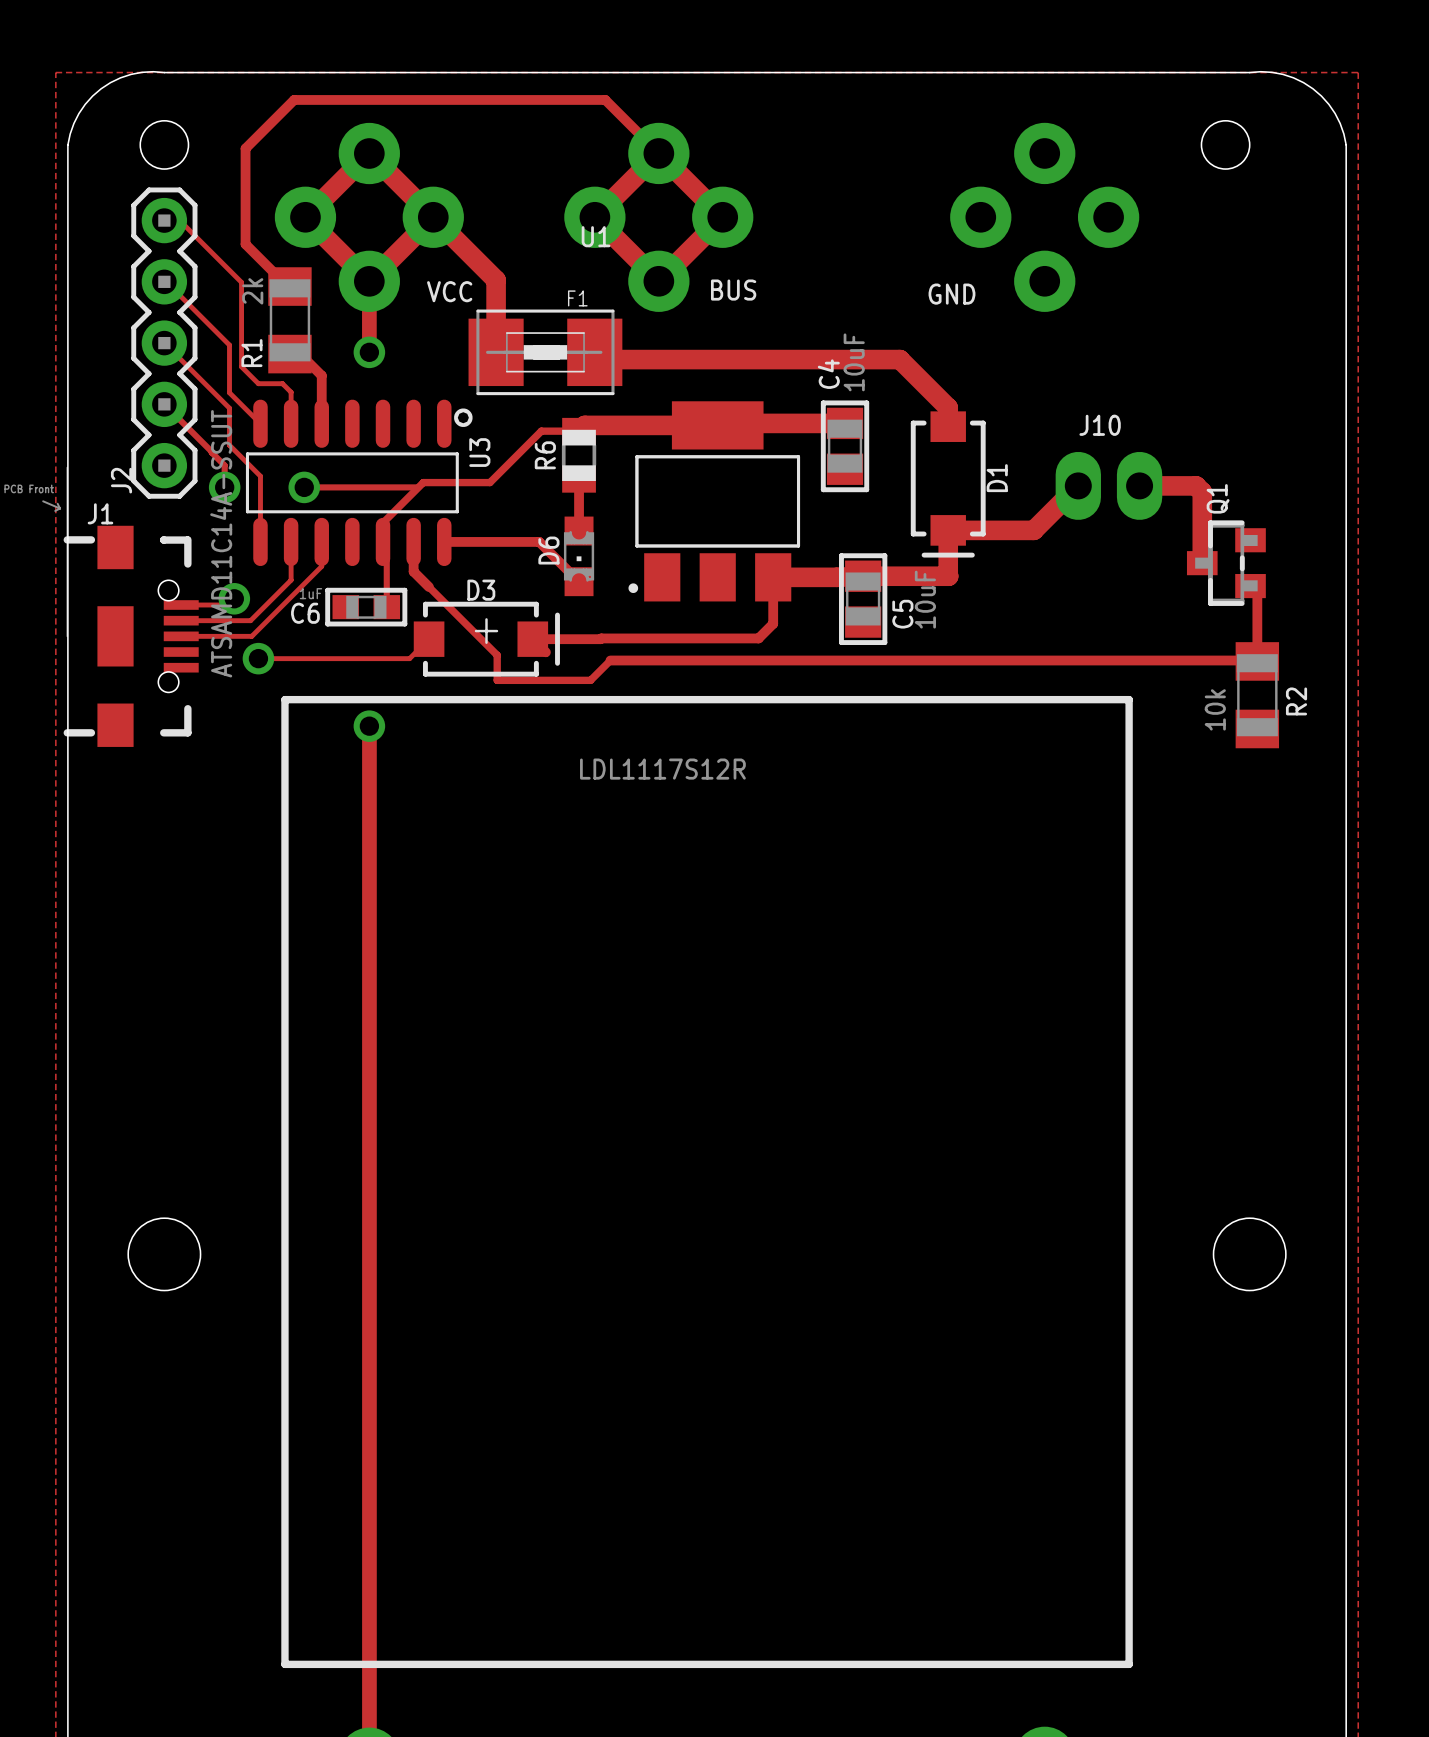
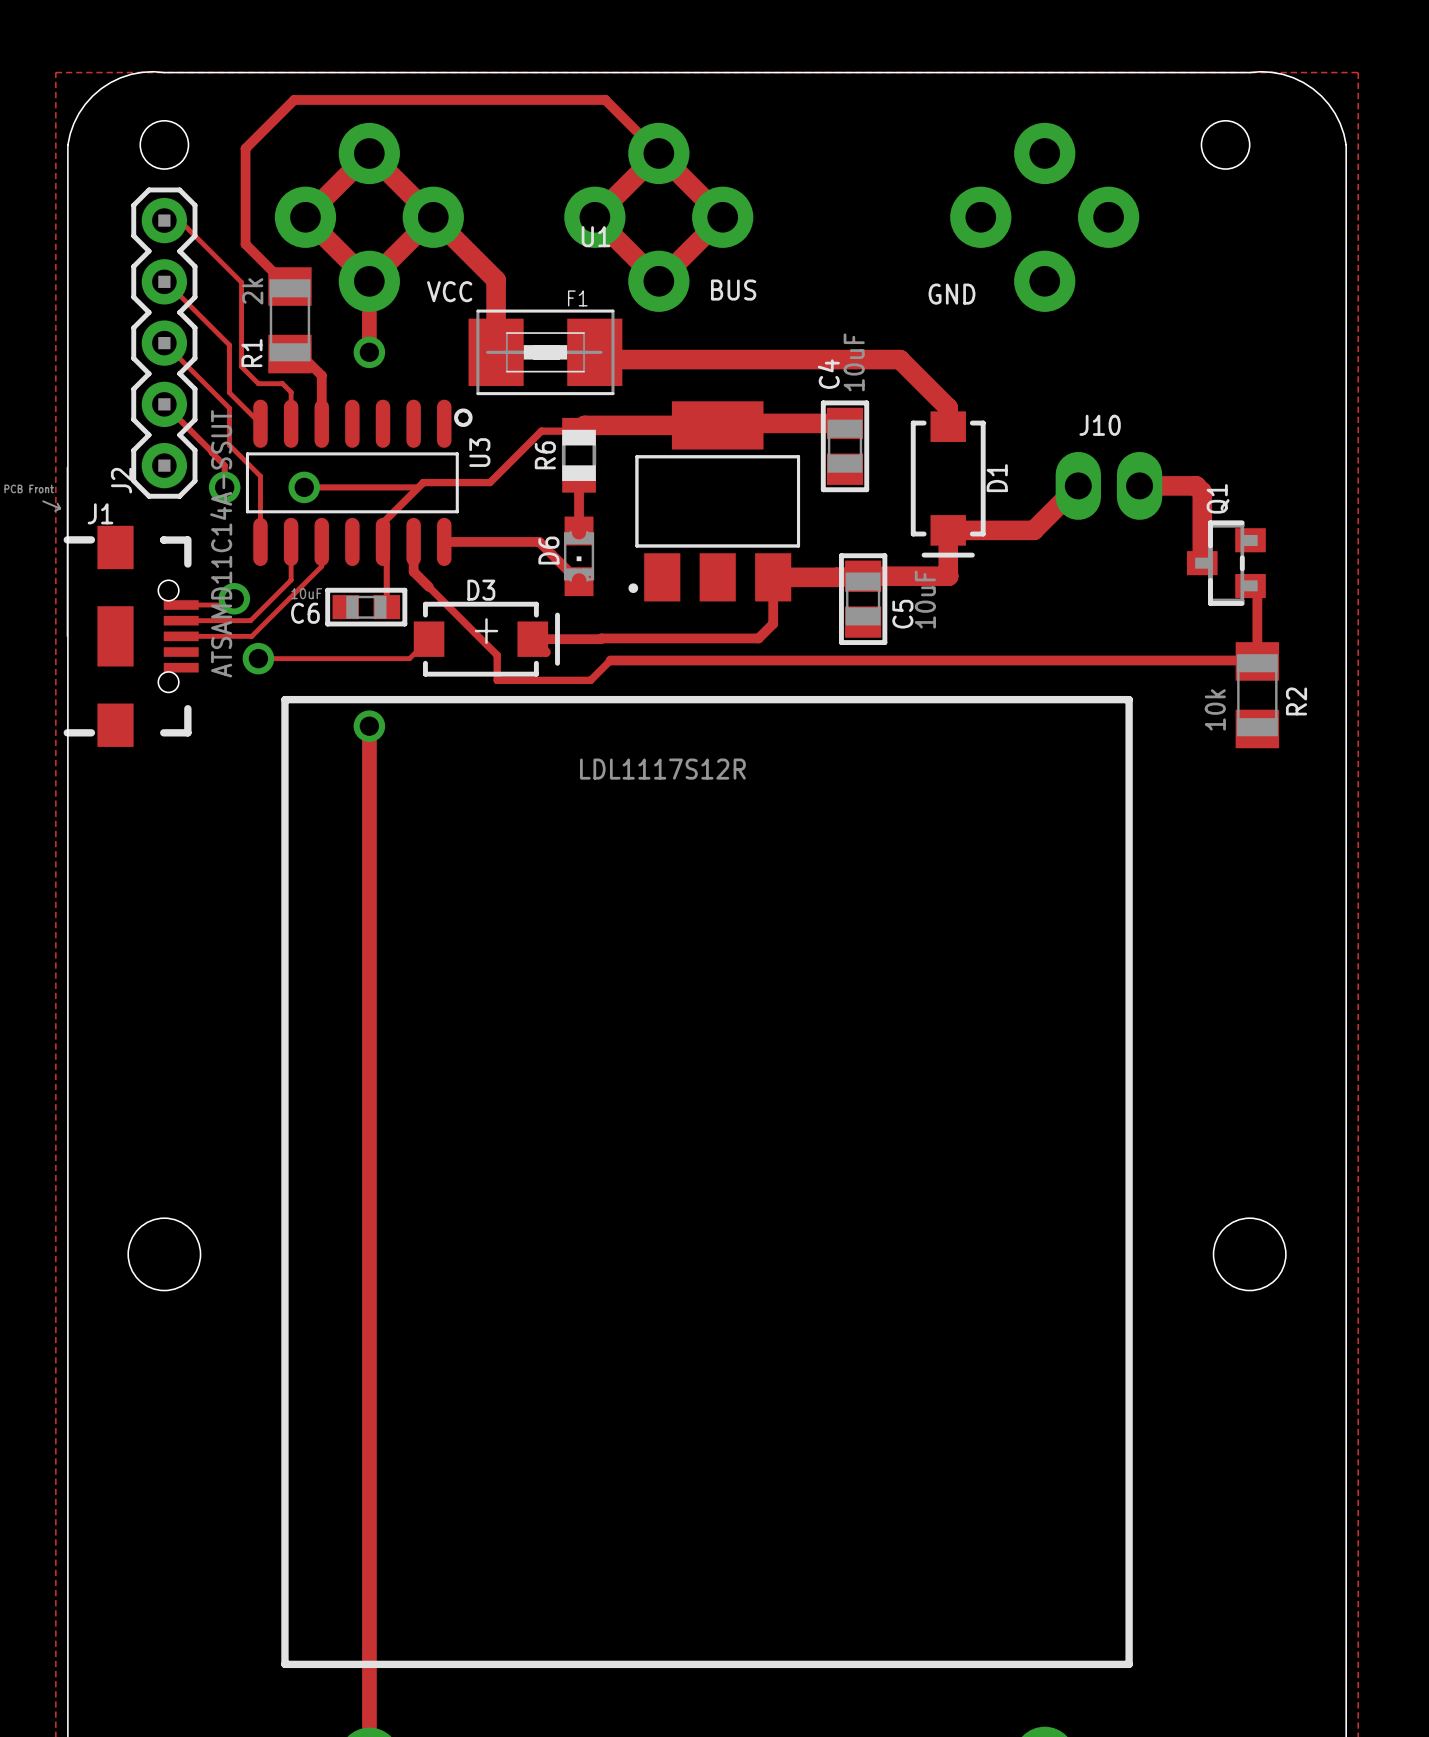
C6 value: 1uF (310, 593) -> 10uF (306, 593)

